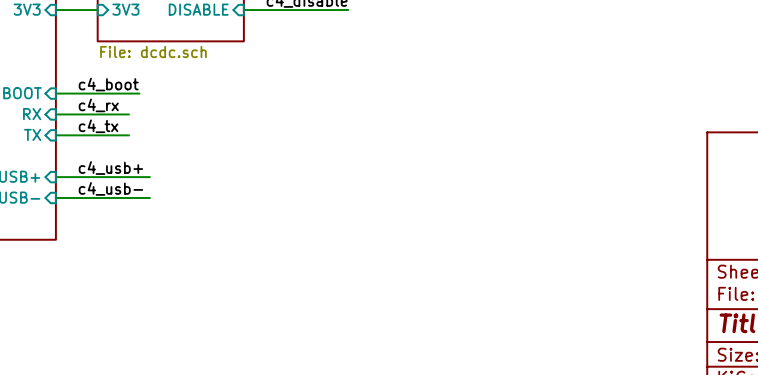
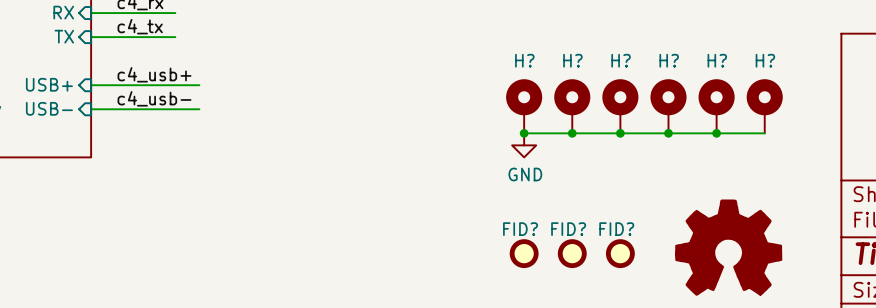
H?: none -> (524, 106)
H?: none -> (572, 106)
H?: none -> (620, 106)
H?: none -> (668, 106)
H?: none -> (716, 106)
H?: none -> (764, 106)
wire: none -> (524, 133) (764, 133)
junction: none -> (524, 133)
junction: none -> (572, 133)
junction: none -> (620, 133)
junction: none -> (668, 133)
junction: none -> (716, 133)
power symbol: none -> GND (524, 145)
power symbol: none -> (728, 247)
FID?: none -> (524, 253)
FID?: none -> (572, 253)
FID?: none -> (620, 253)

